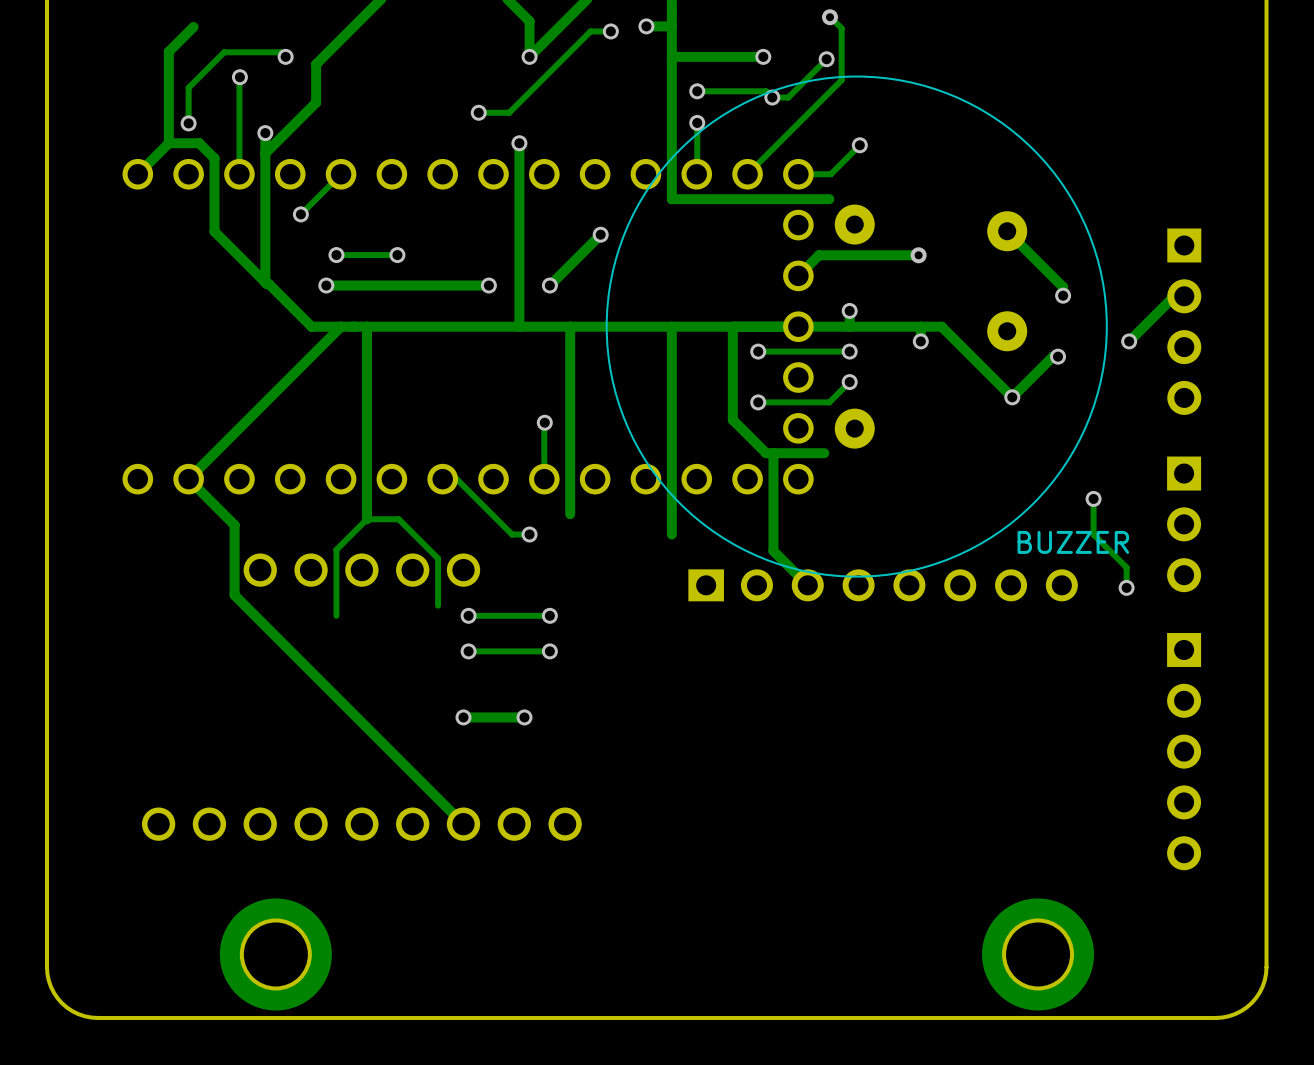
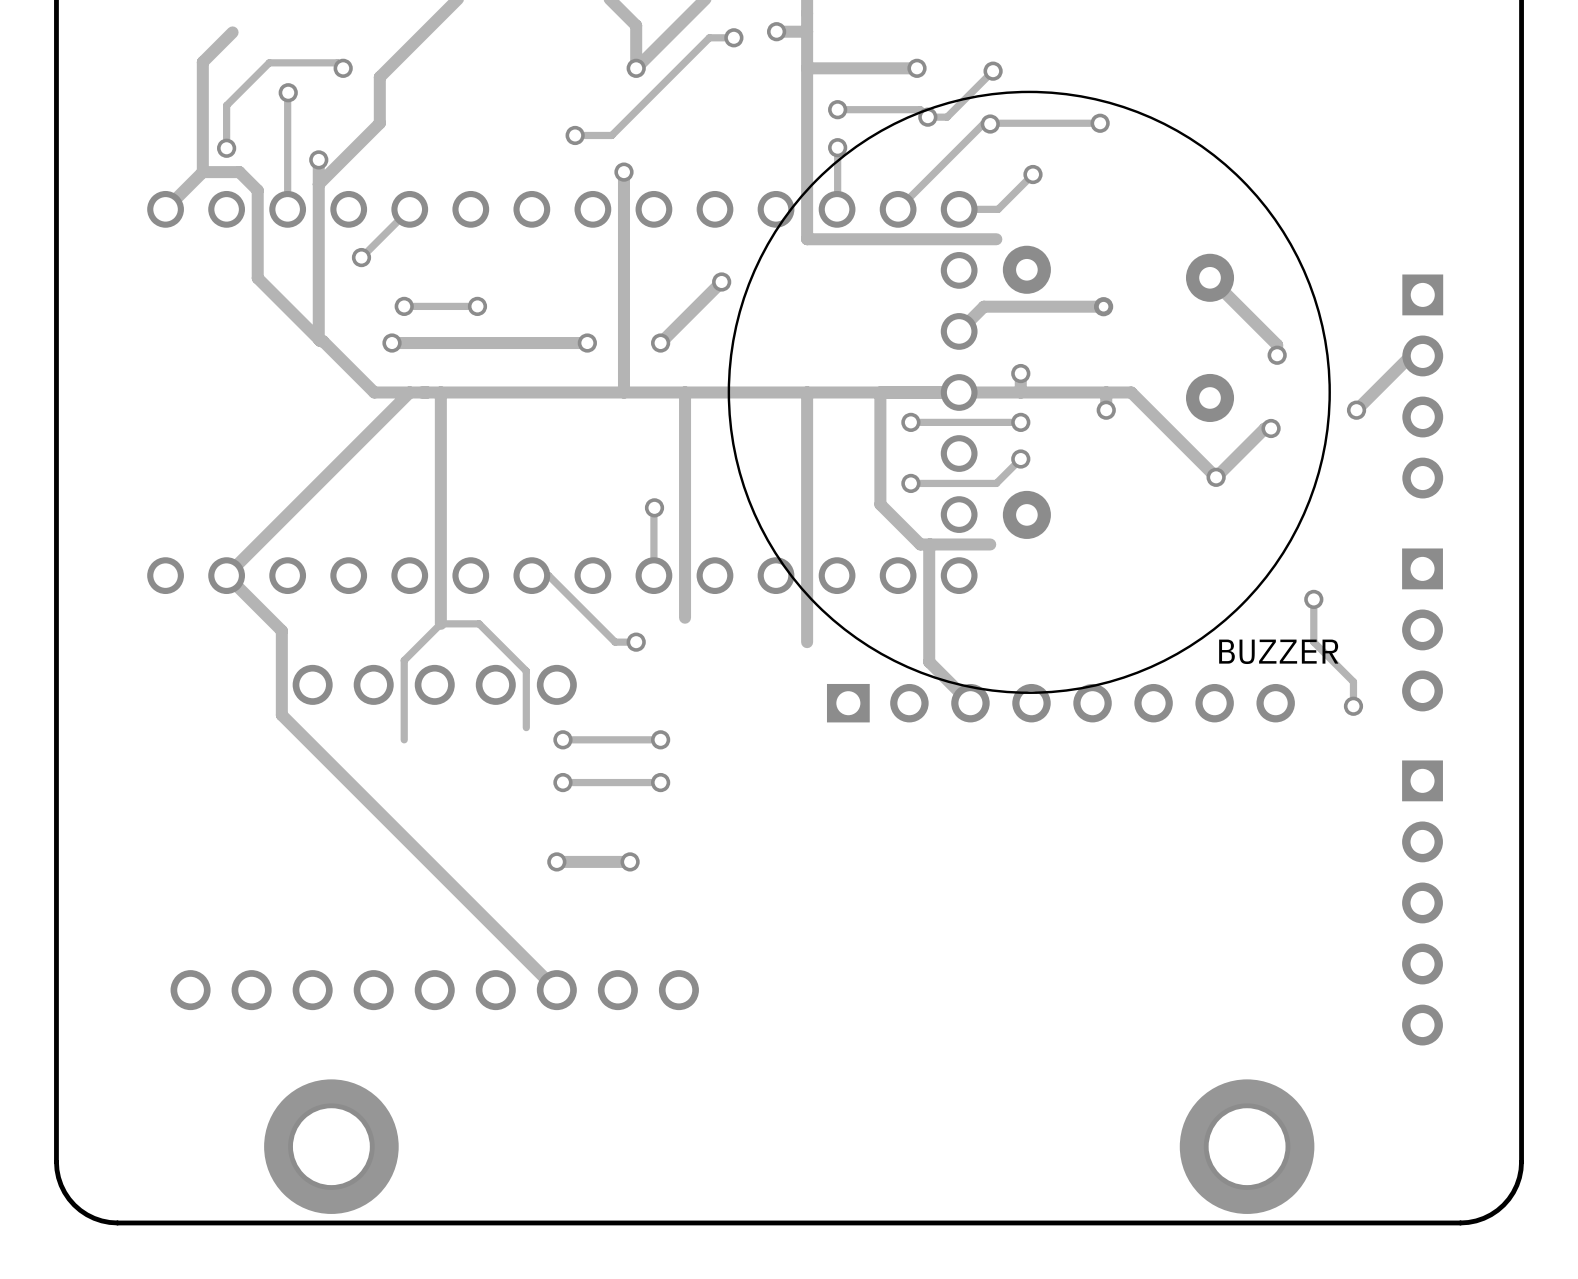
track: (830, 17) (841, 28) (841, 80) (818, 103) -> (1100, 123) (983, 124)
via: (830, 17) -> none
via: none -> (1100, 123)
via: none -> (990, 124)

